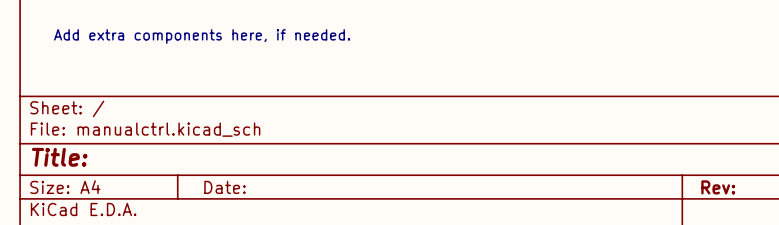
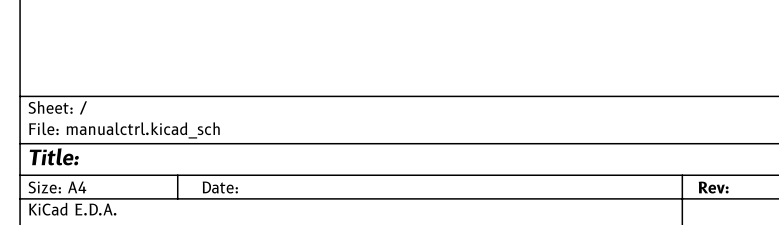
text: Add extra components here, if needed. (202, 36) -> none

